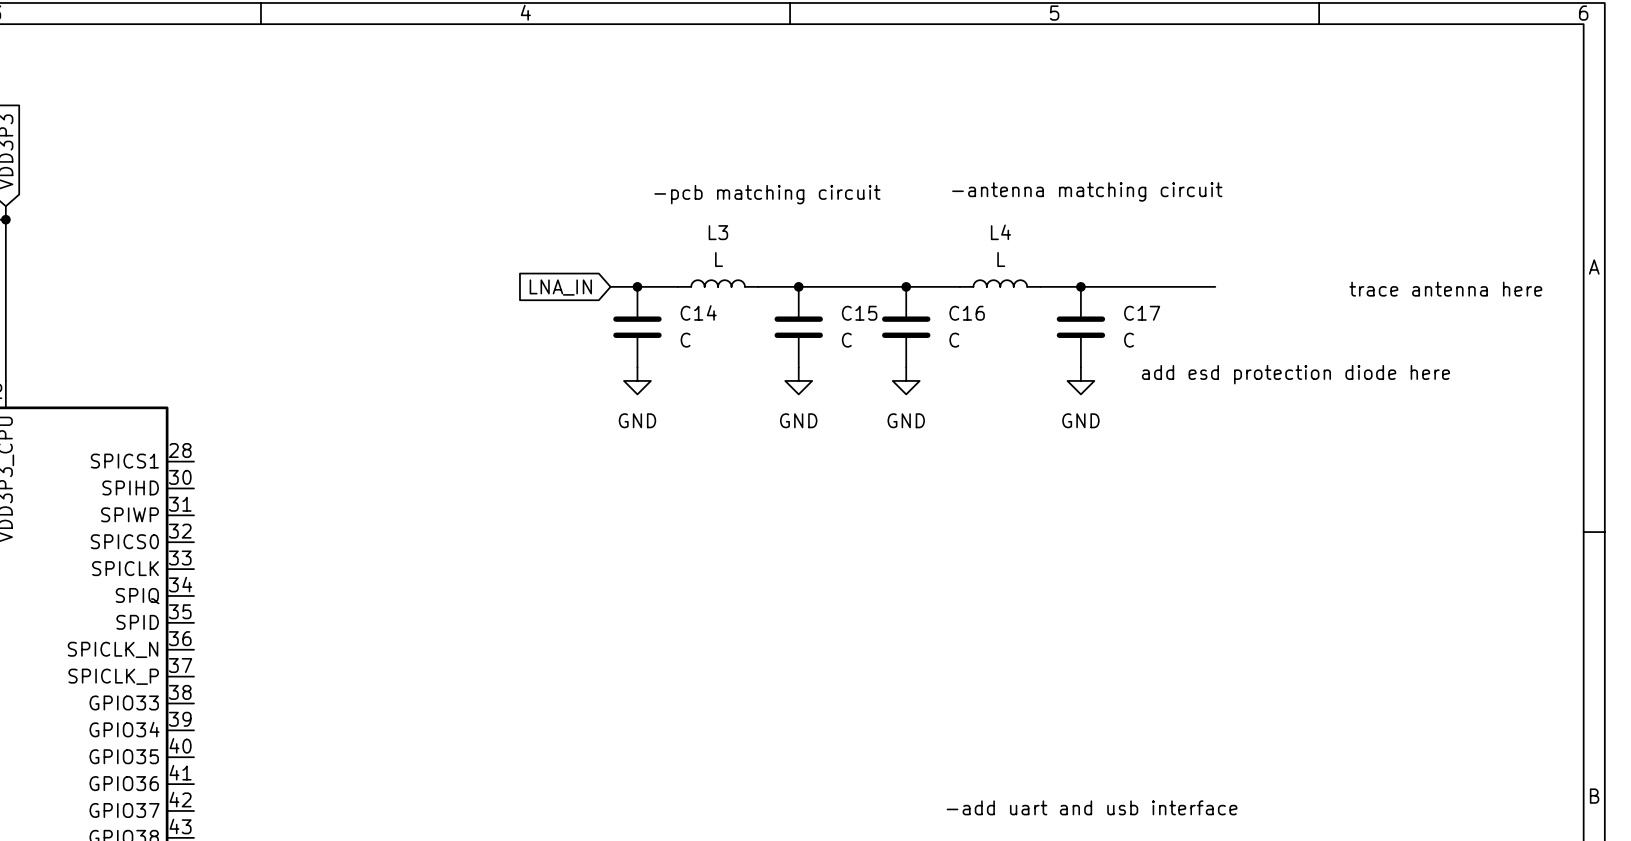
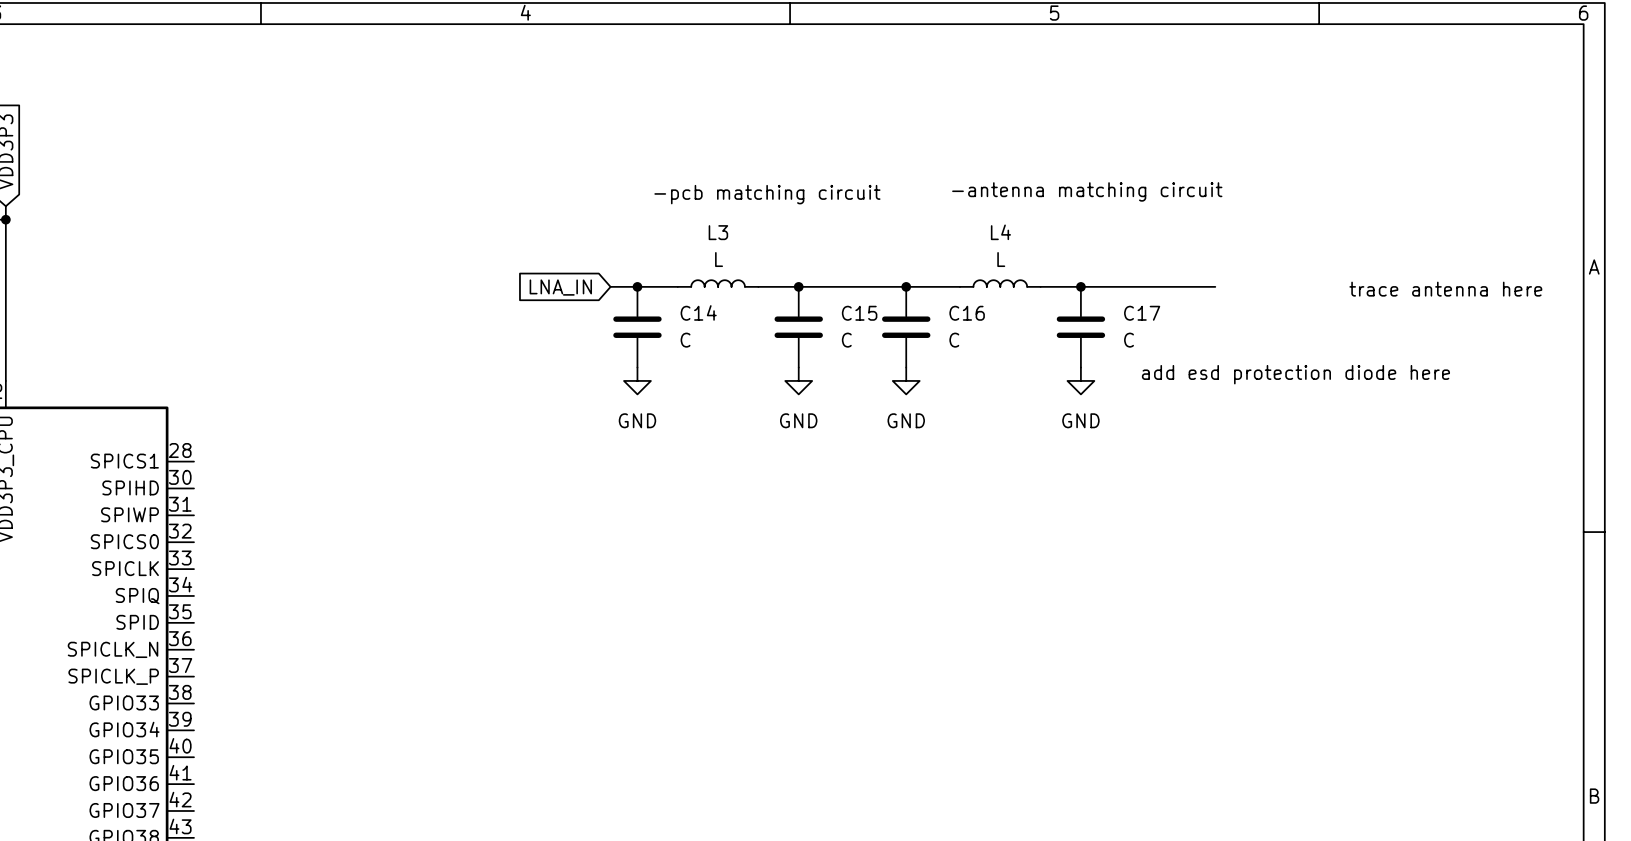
text: -add uart and usb interface (1092, 807) -> none

